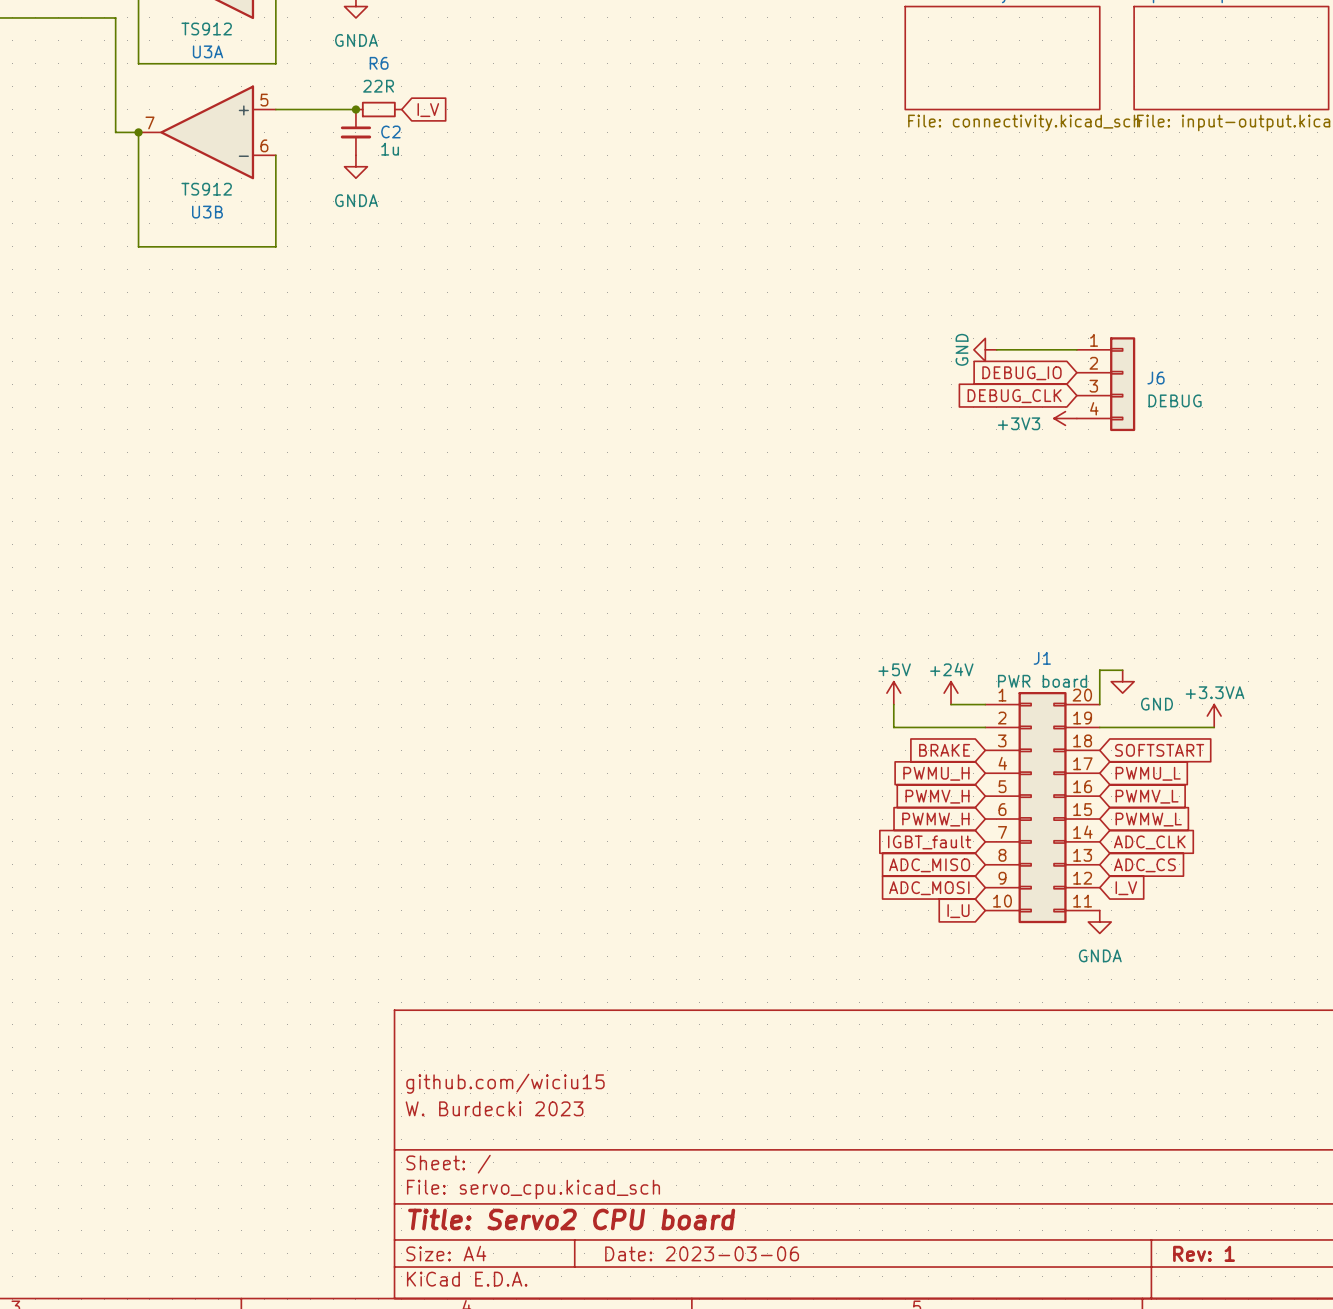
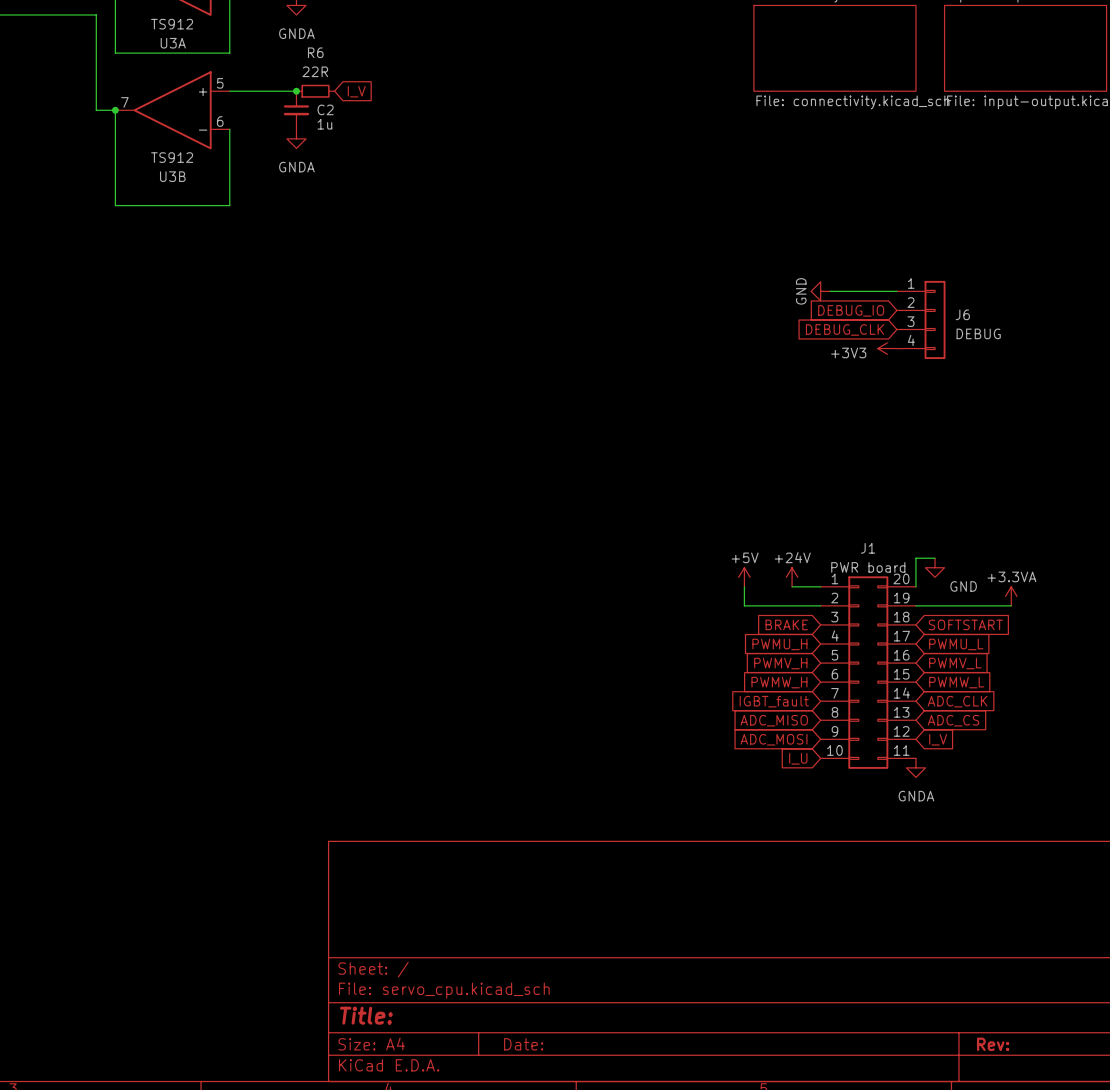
title block: github.com/wiciu15 (505, 1083) -> none
title block: W. Burdecki 2023 (494, 1108) -> none
title block: Title: Servo2 CPU board (571, 1219) -> Title: (366, 1015)
title block: Date: 2023-03-06 (702, 1253) -> Date: (523, 1044)
title block: Rev: 1 (1204, 1253) -> Rev: (993, 1044)

